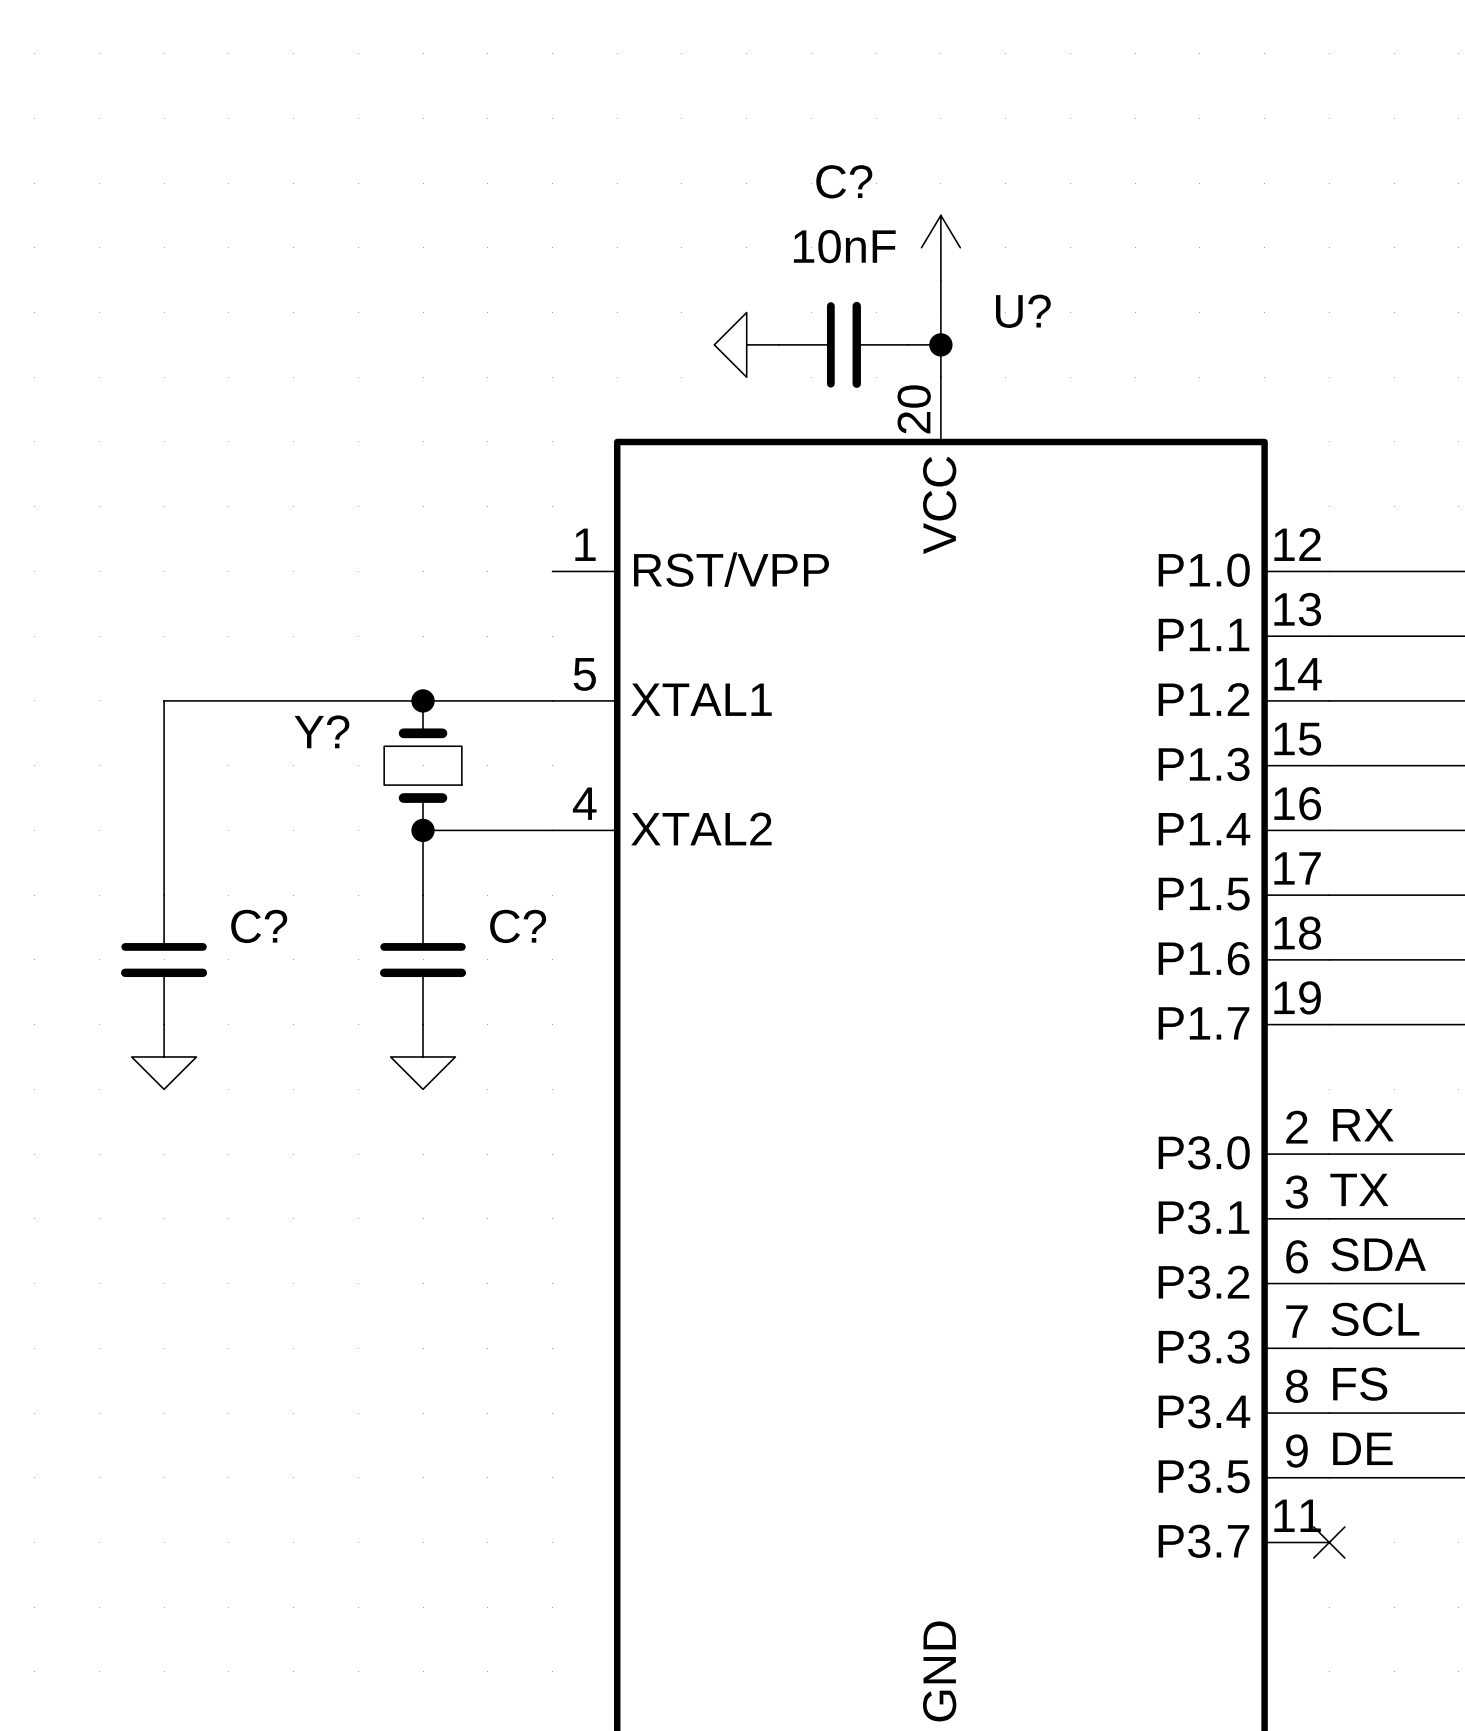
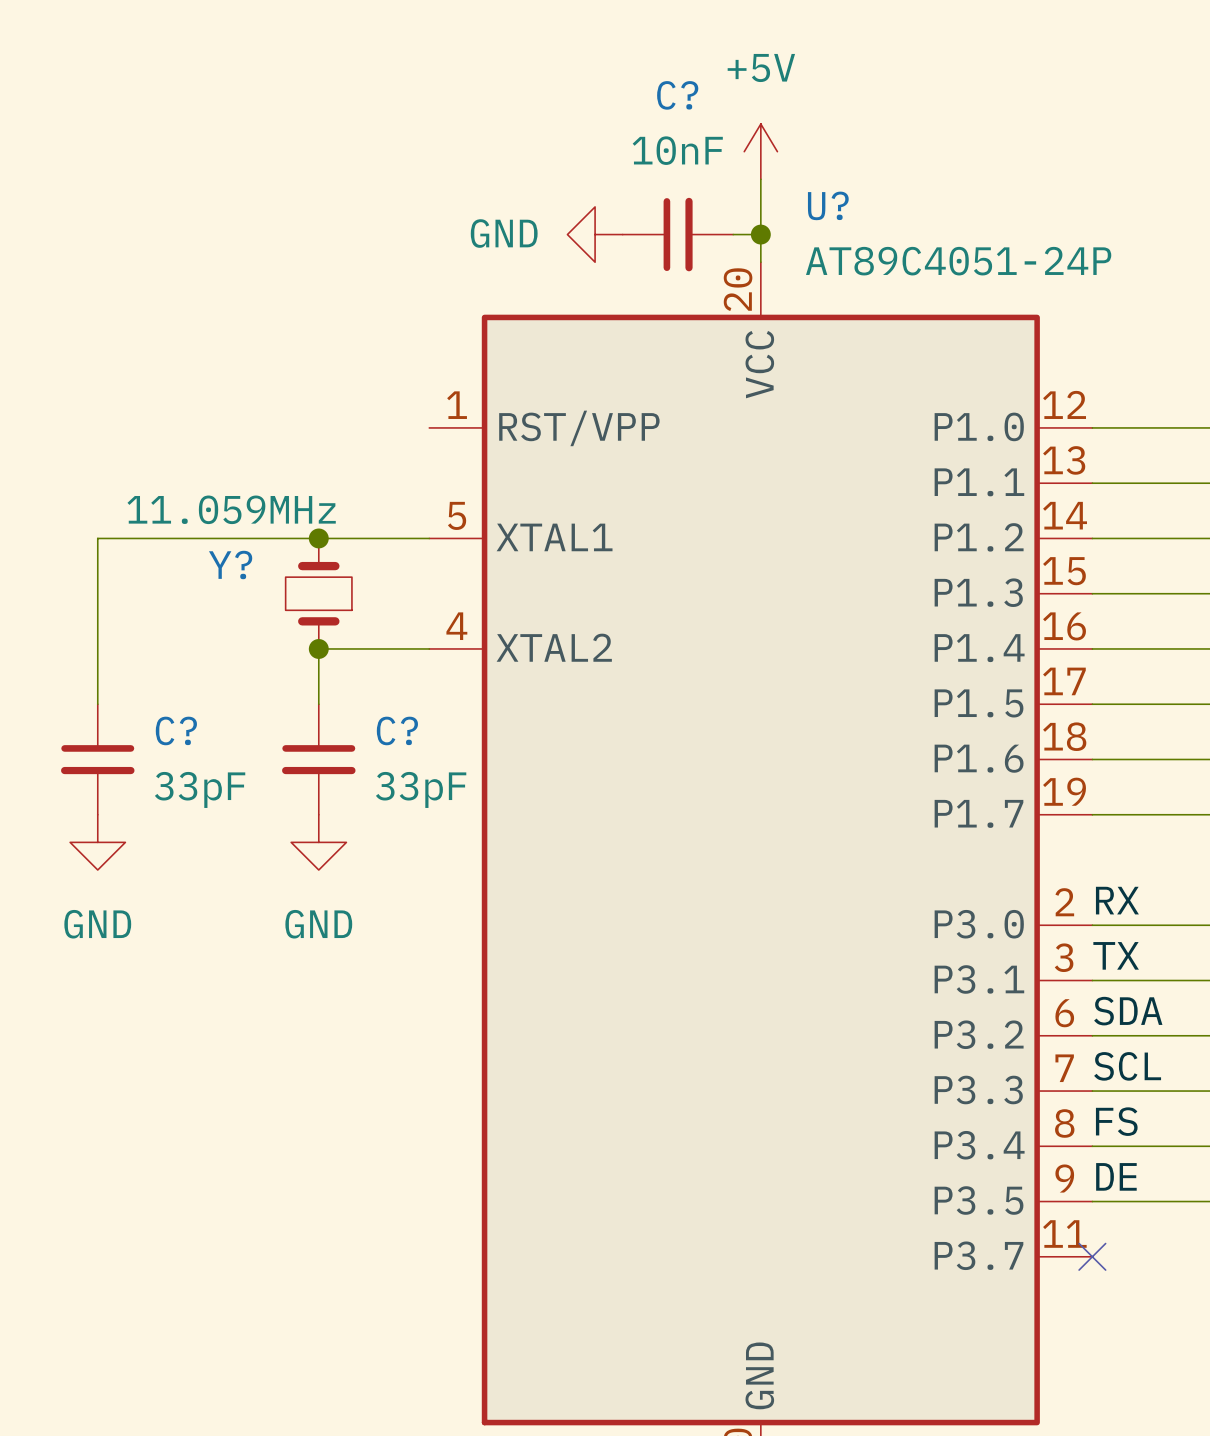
power symbol text: none -> +5V (761, 67)
power symbol text: none -> GND (504, 233)
U? value: none -> AT89C4051-24P (958, 261)
Y? value: none -> 11.059MHz (231, 509)
C? value: none -> 33pF (200, 789)
C? value: none -> 33pF (421, 789)
power symbol text: none -> GND (97, 924)
power symbol text: none -> GND (318, 924)

